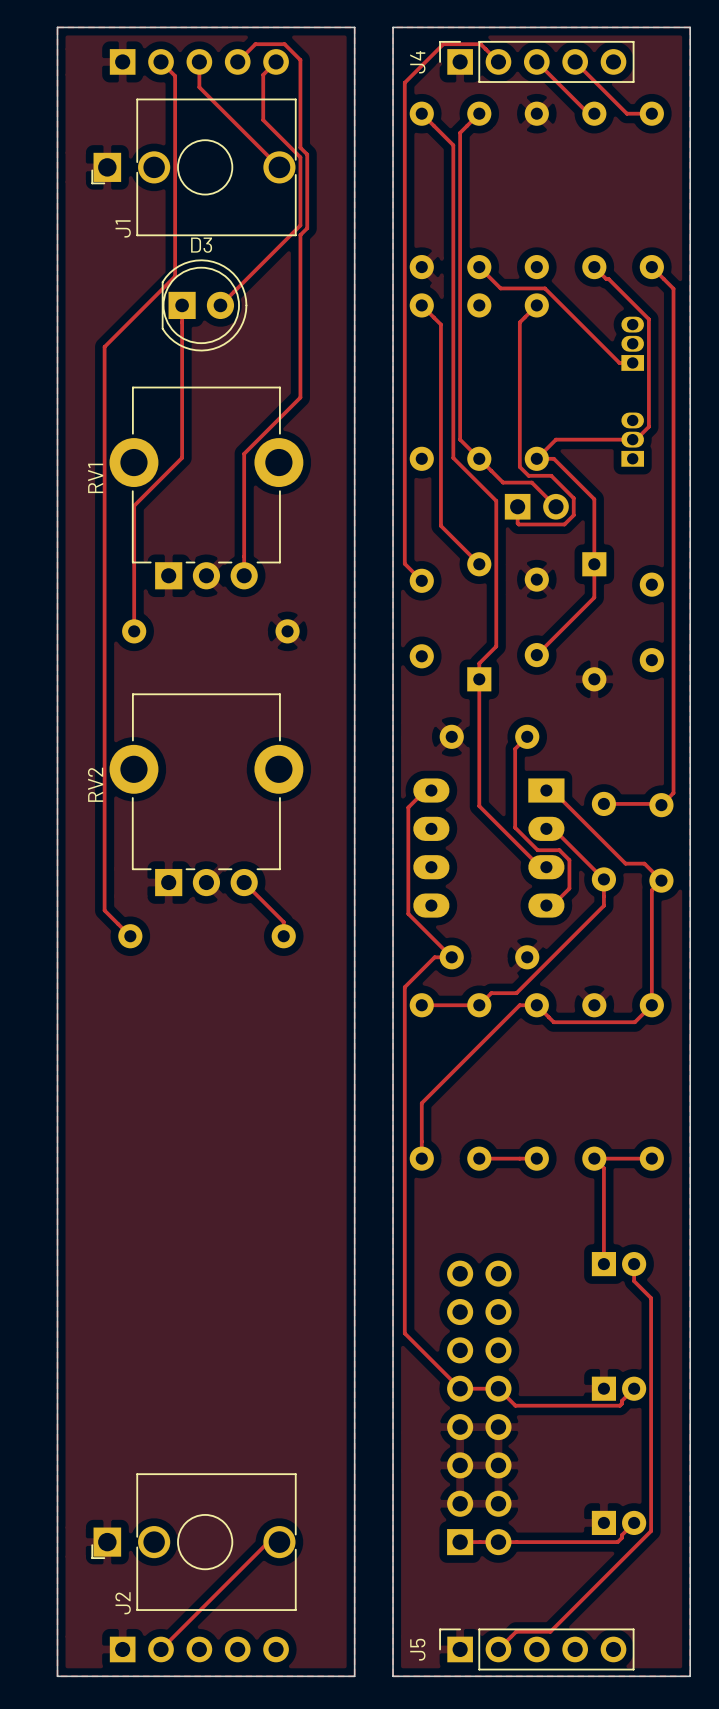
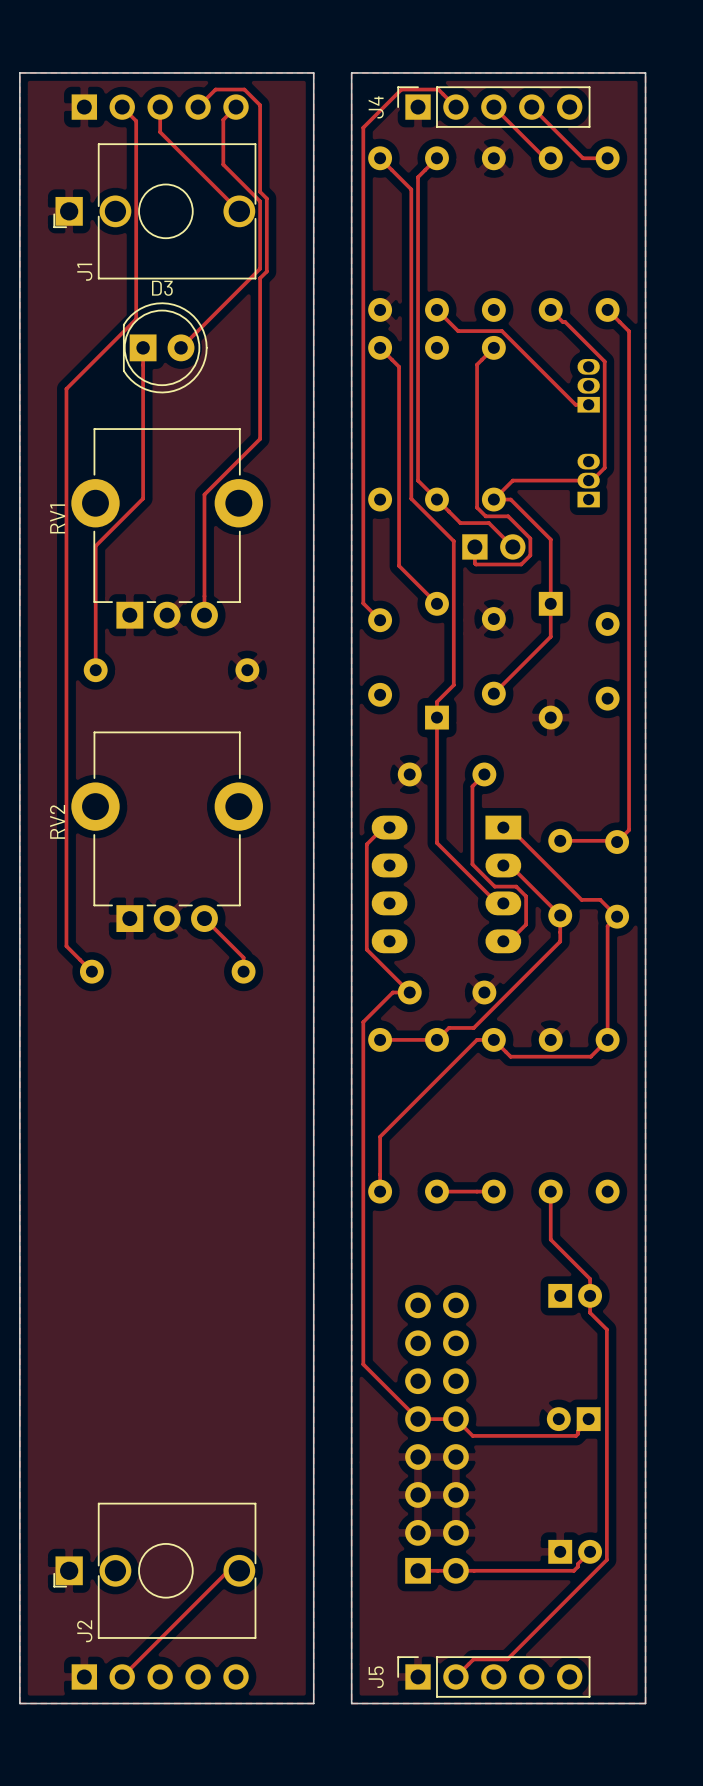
track: (651, 1158) (594, 1158) (603, 1168) (603, 1264) -> none
track: none -> (550, 1198) (550, 1239) (590, 1278) (590, 1295)
part rotation: 0° (619, 1388) -> 180° (573, 1419)

